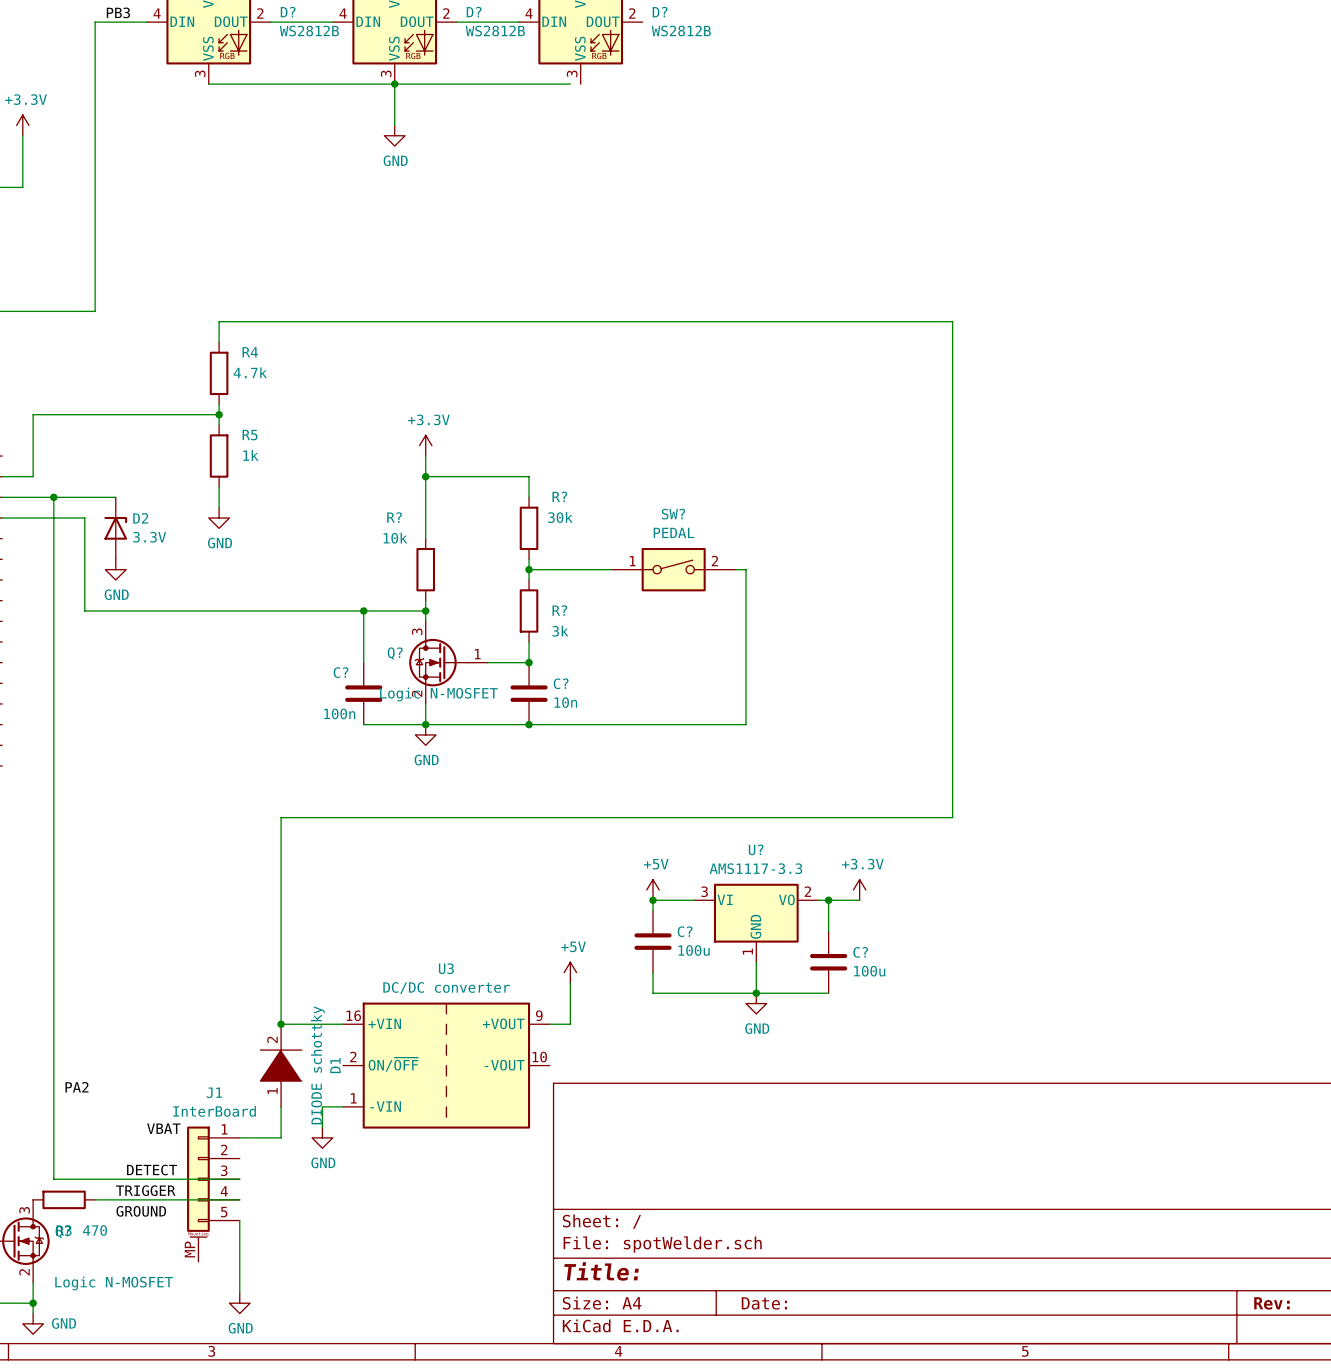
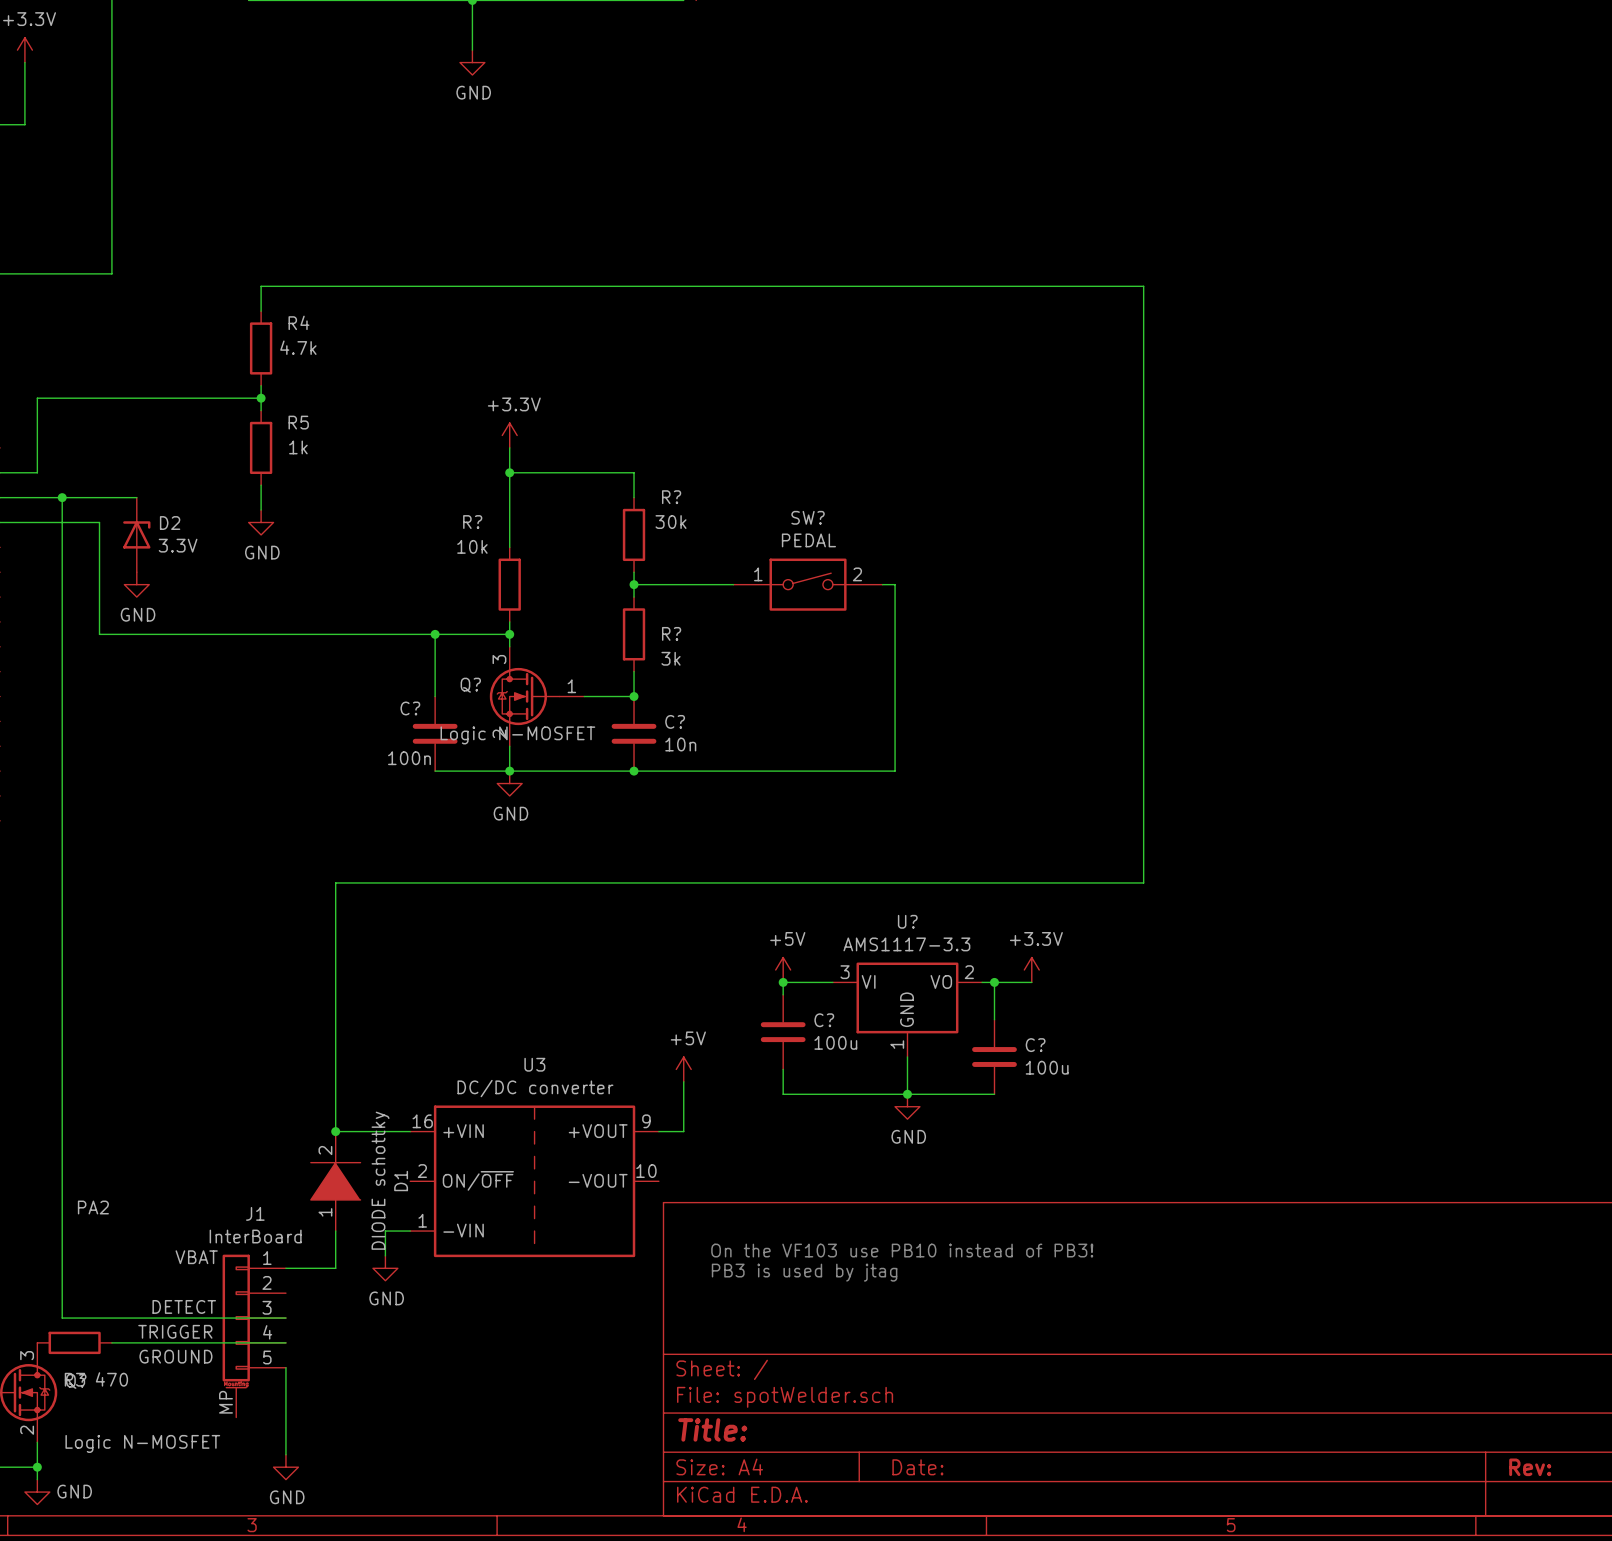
text: none -> On the VF103 use PB10 instead of PB3! (902, 1250)
text: none -> PB3 is used by jtag (804, 1272)

